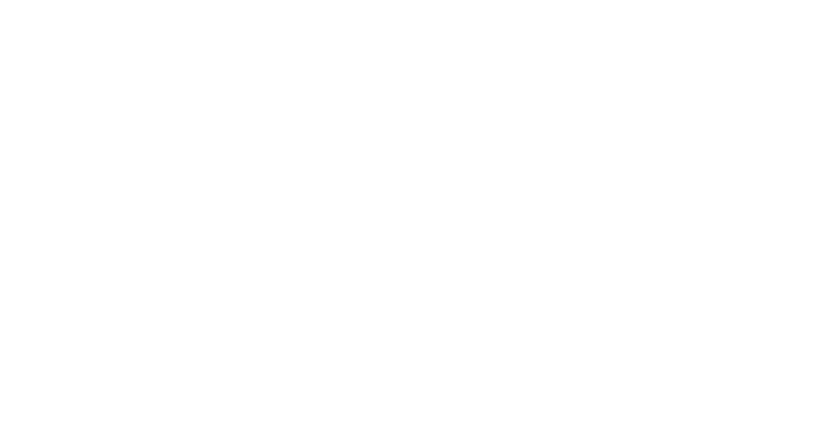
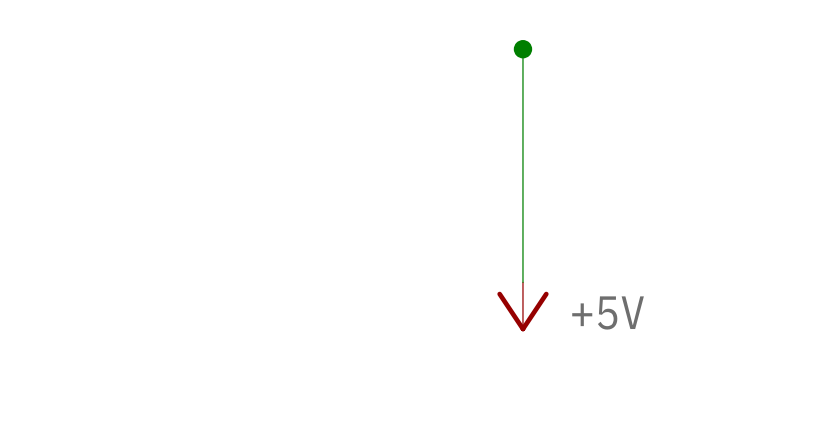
wire: none -> (522, 49) (522, 282)
junction: none -> (522, 49)
power symbol: none -> +5V (522, 306)

